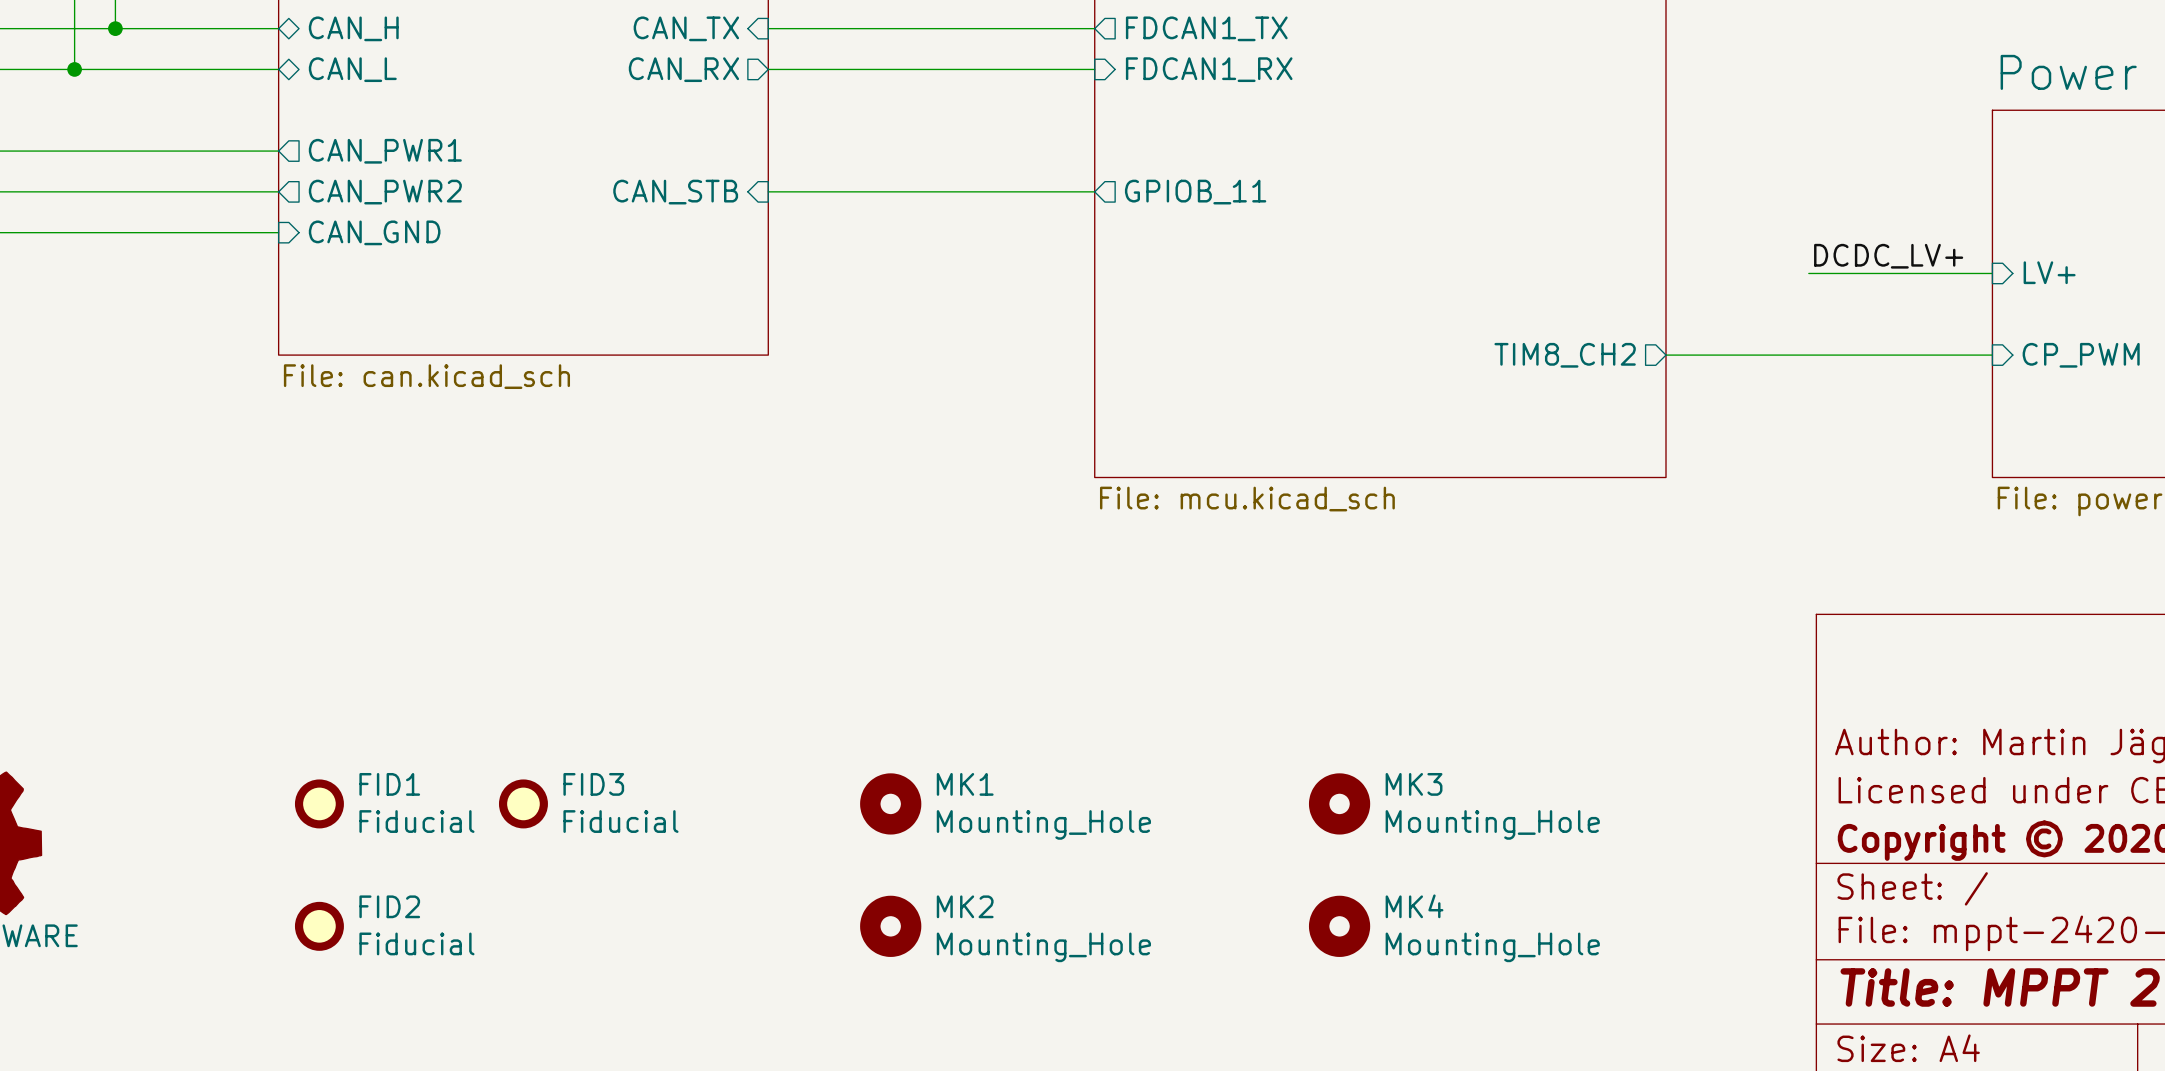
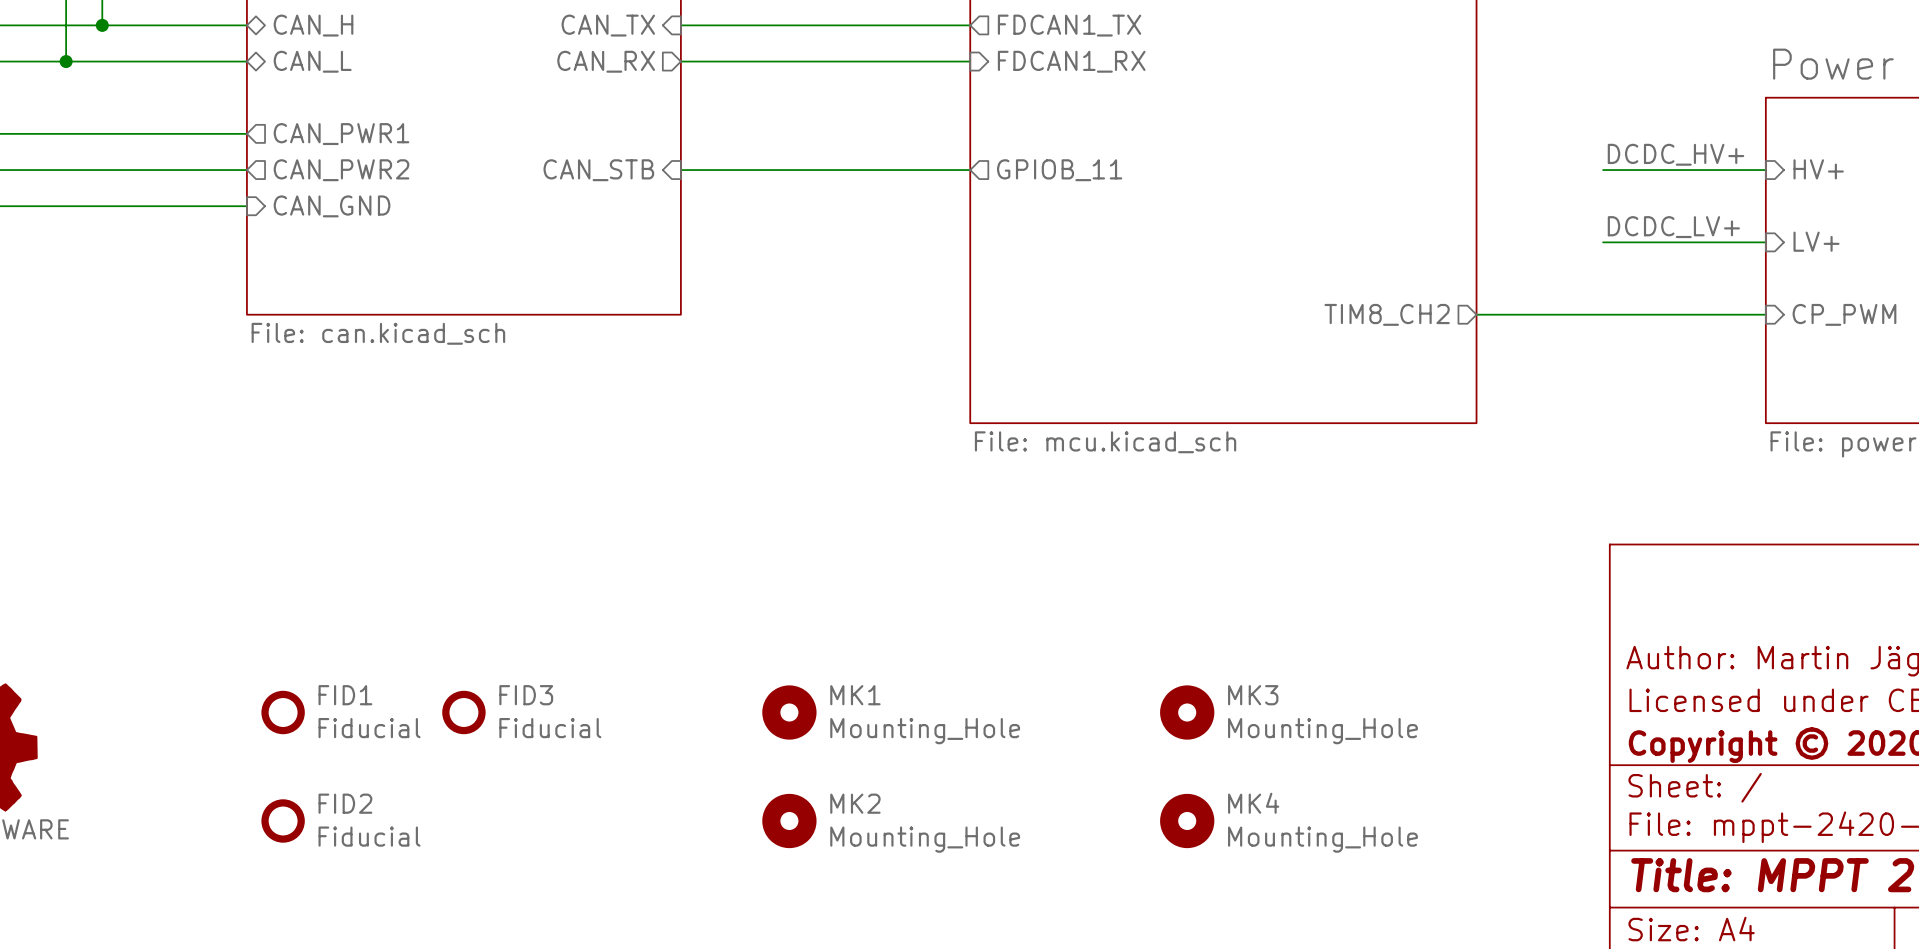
label: none -> DCDC_HV+ (1676, 154)
wire: none -> (1603, 170) (1765, 170)
sheet pin: none -> HV+ (1818, 169)

